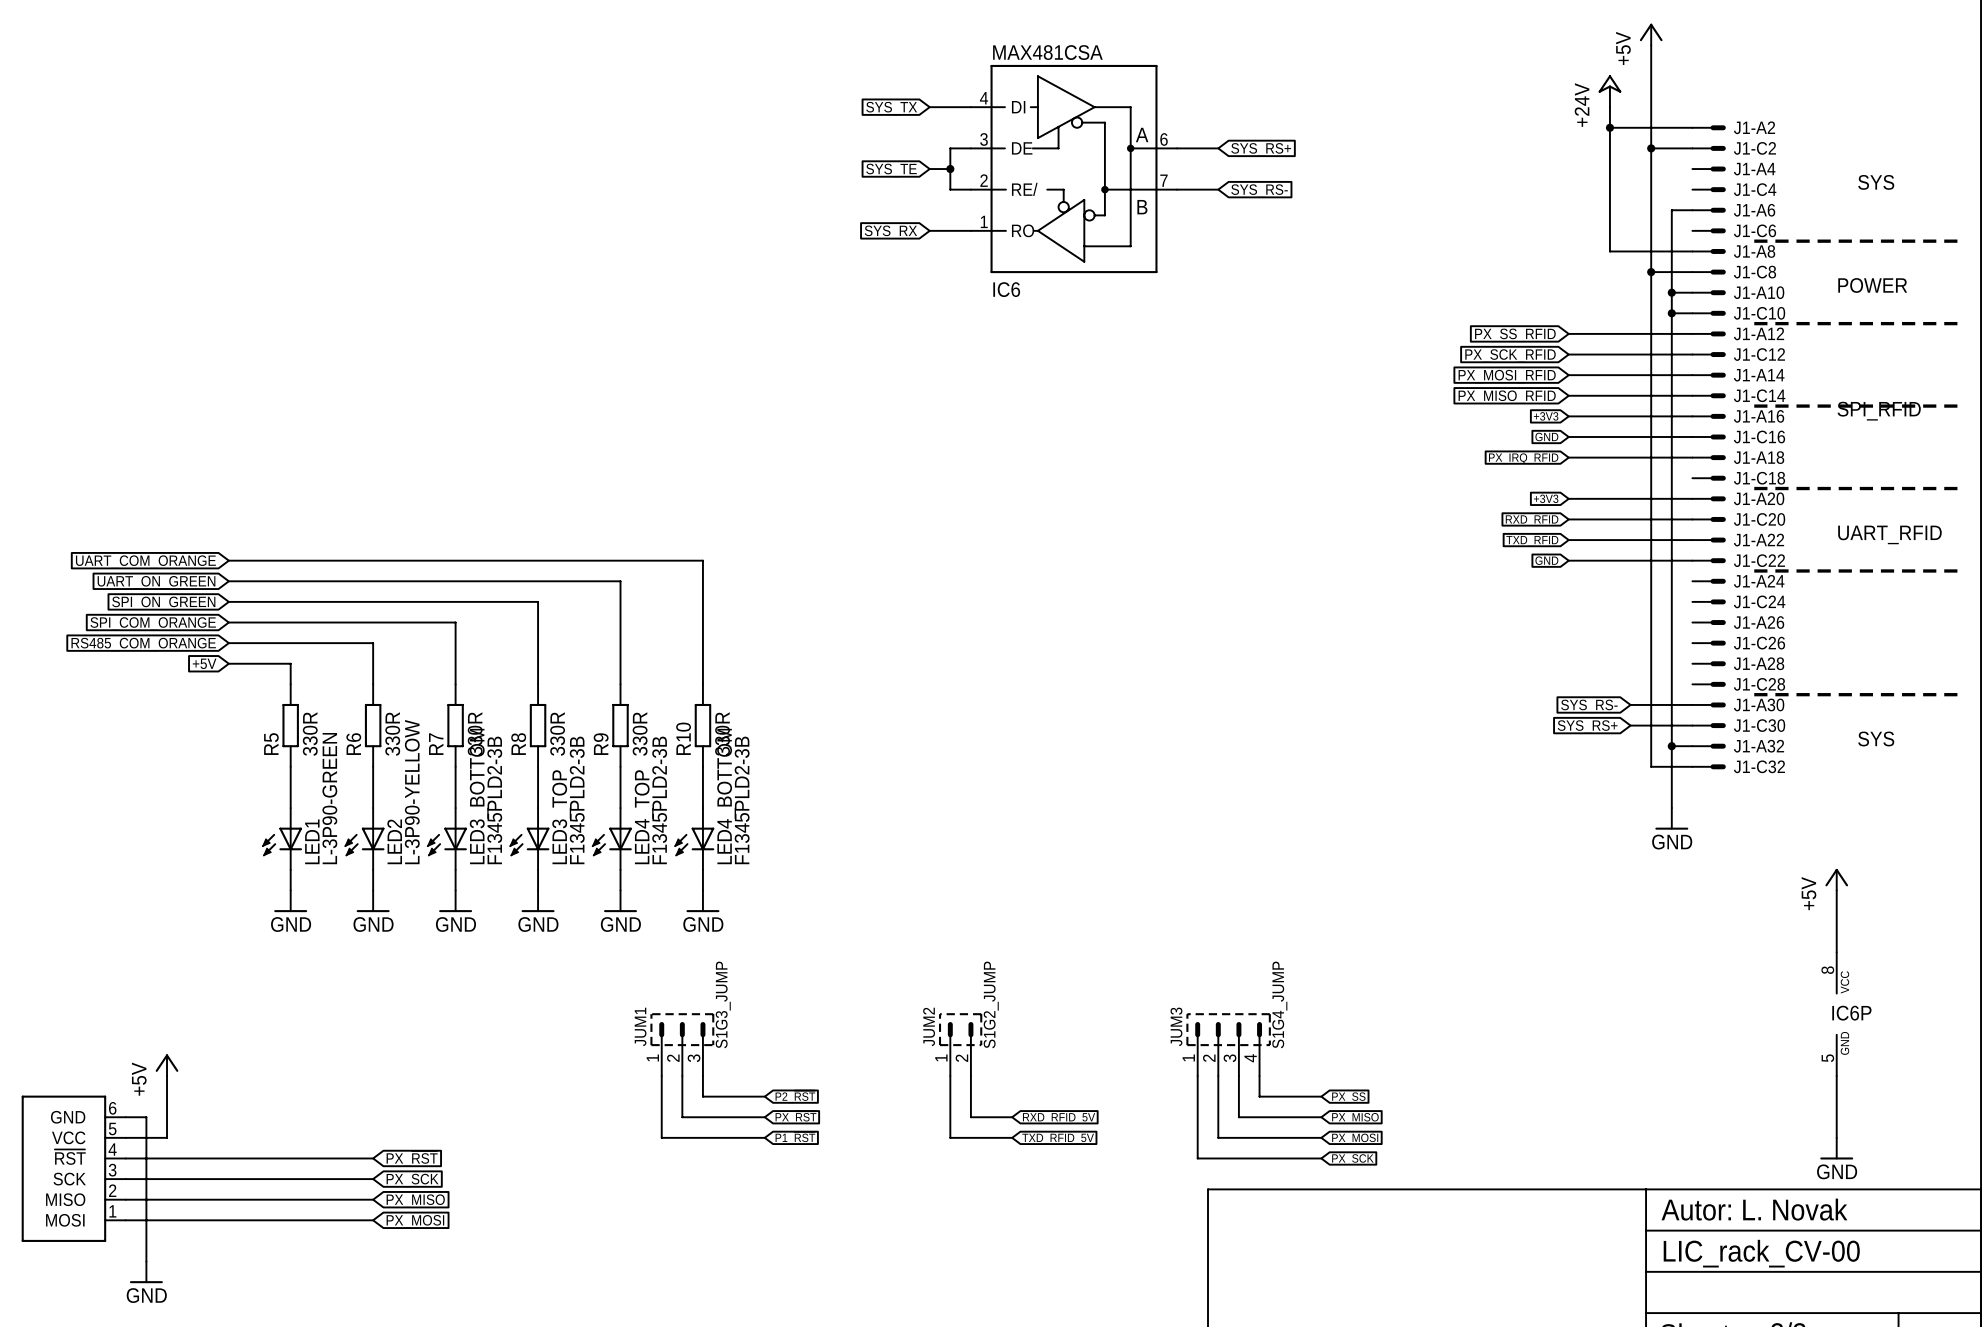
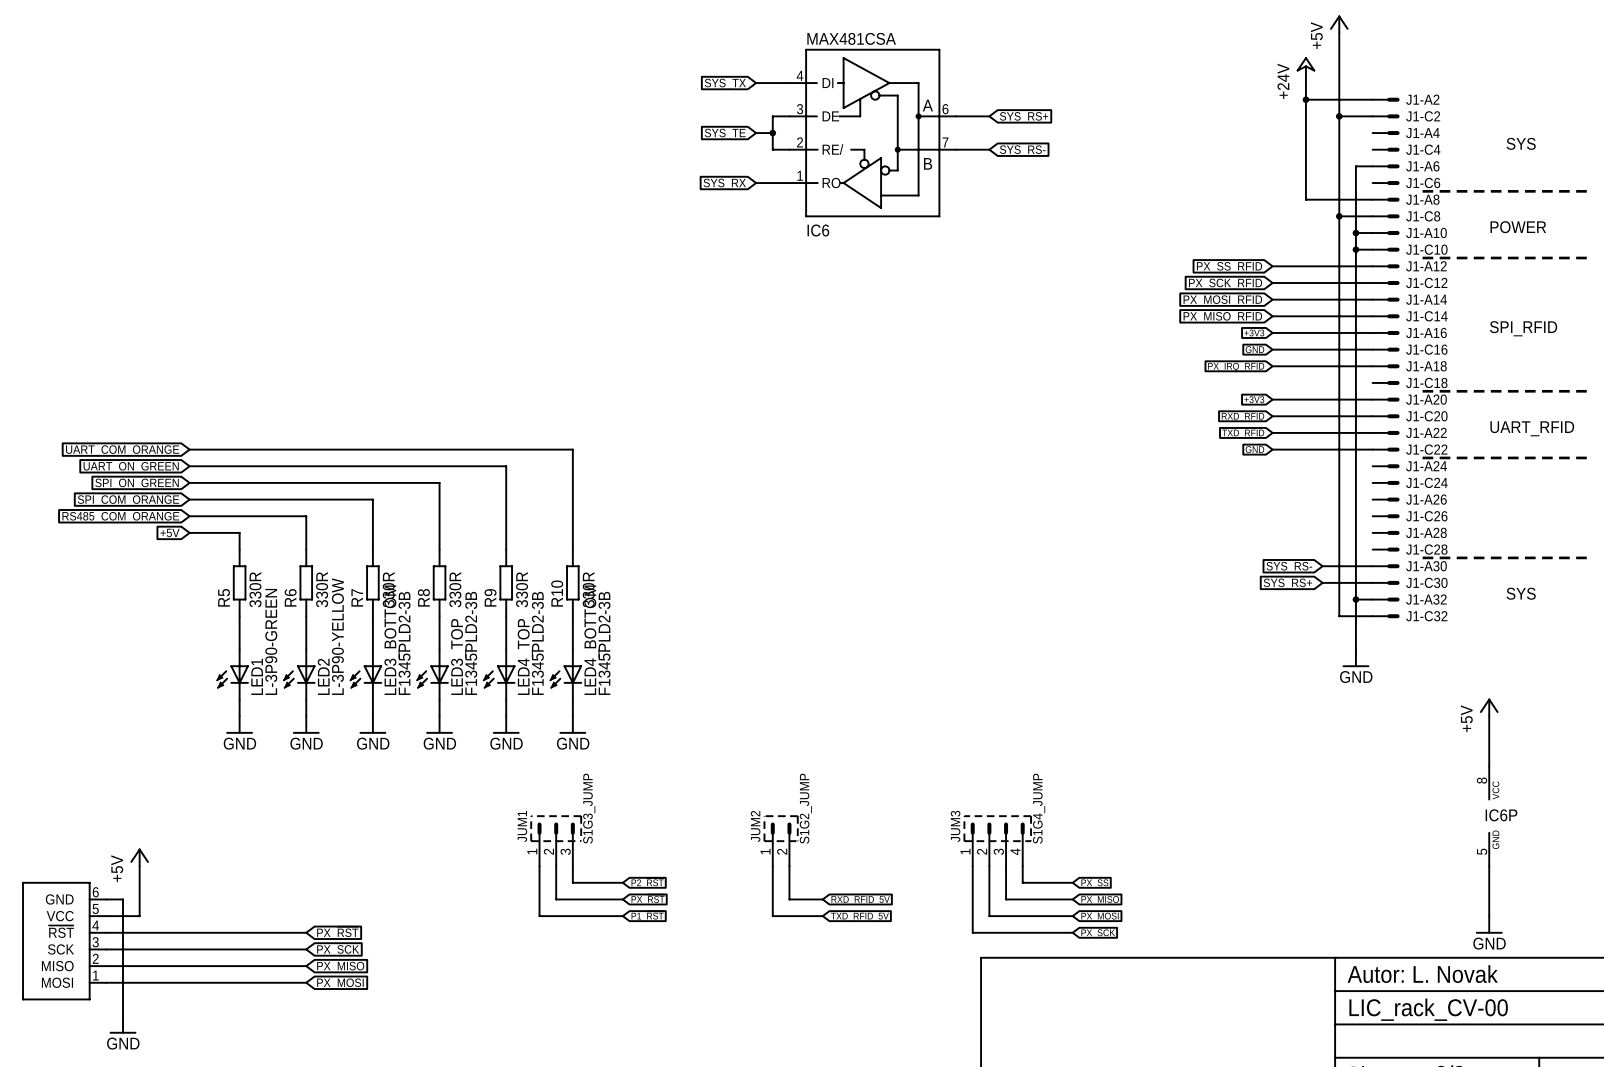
line: (1754, 406) (1960, 406) -> none

